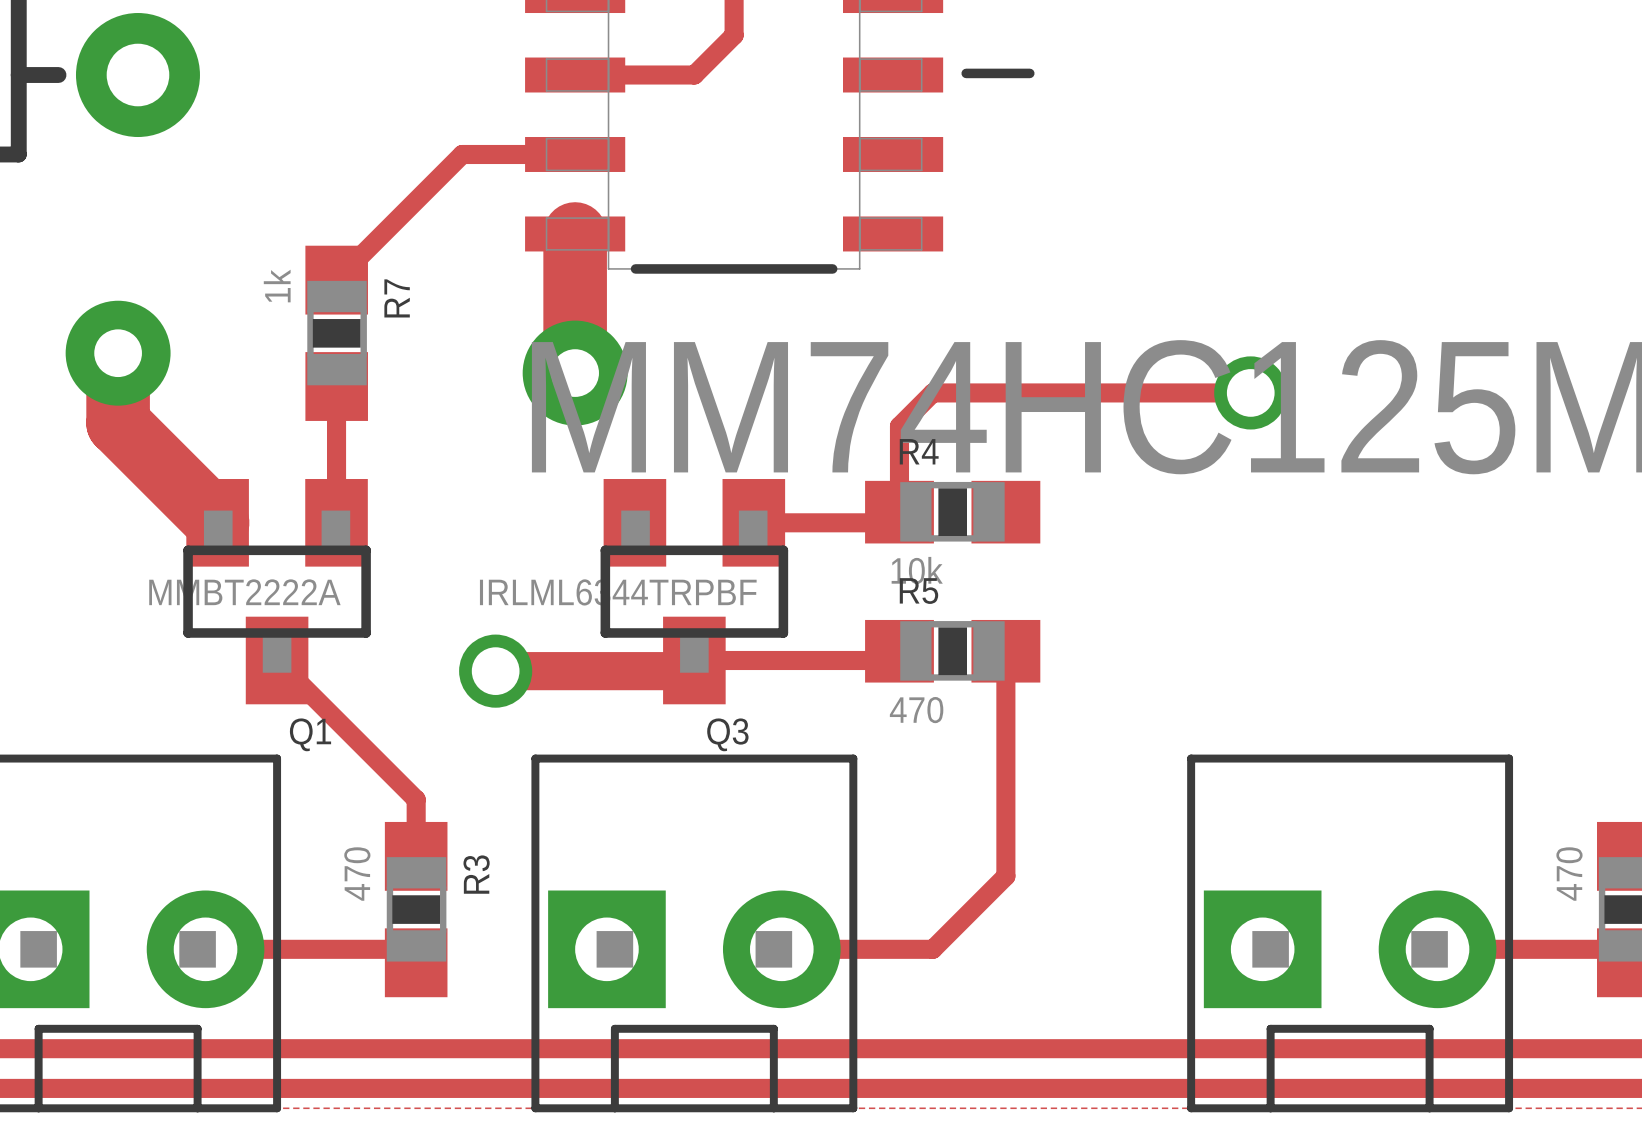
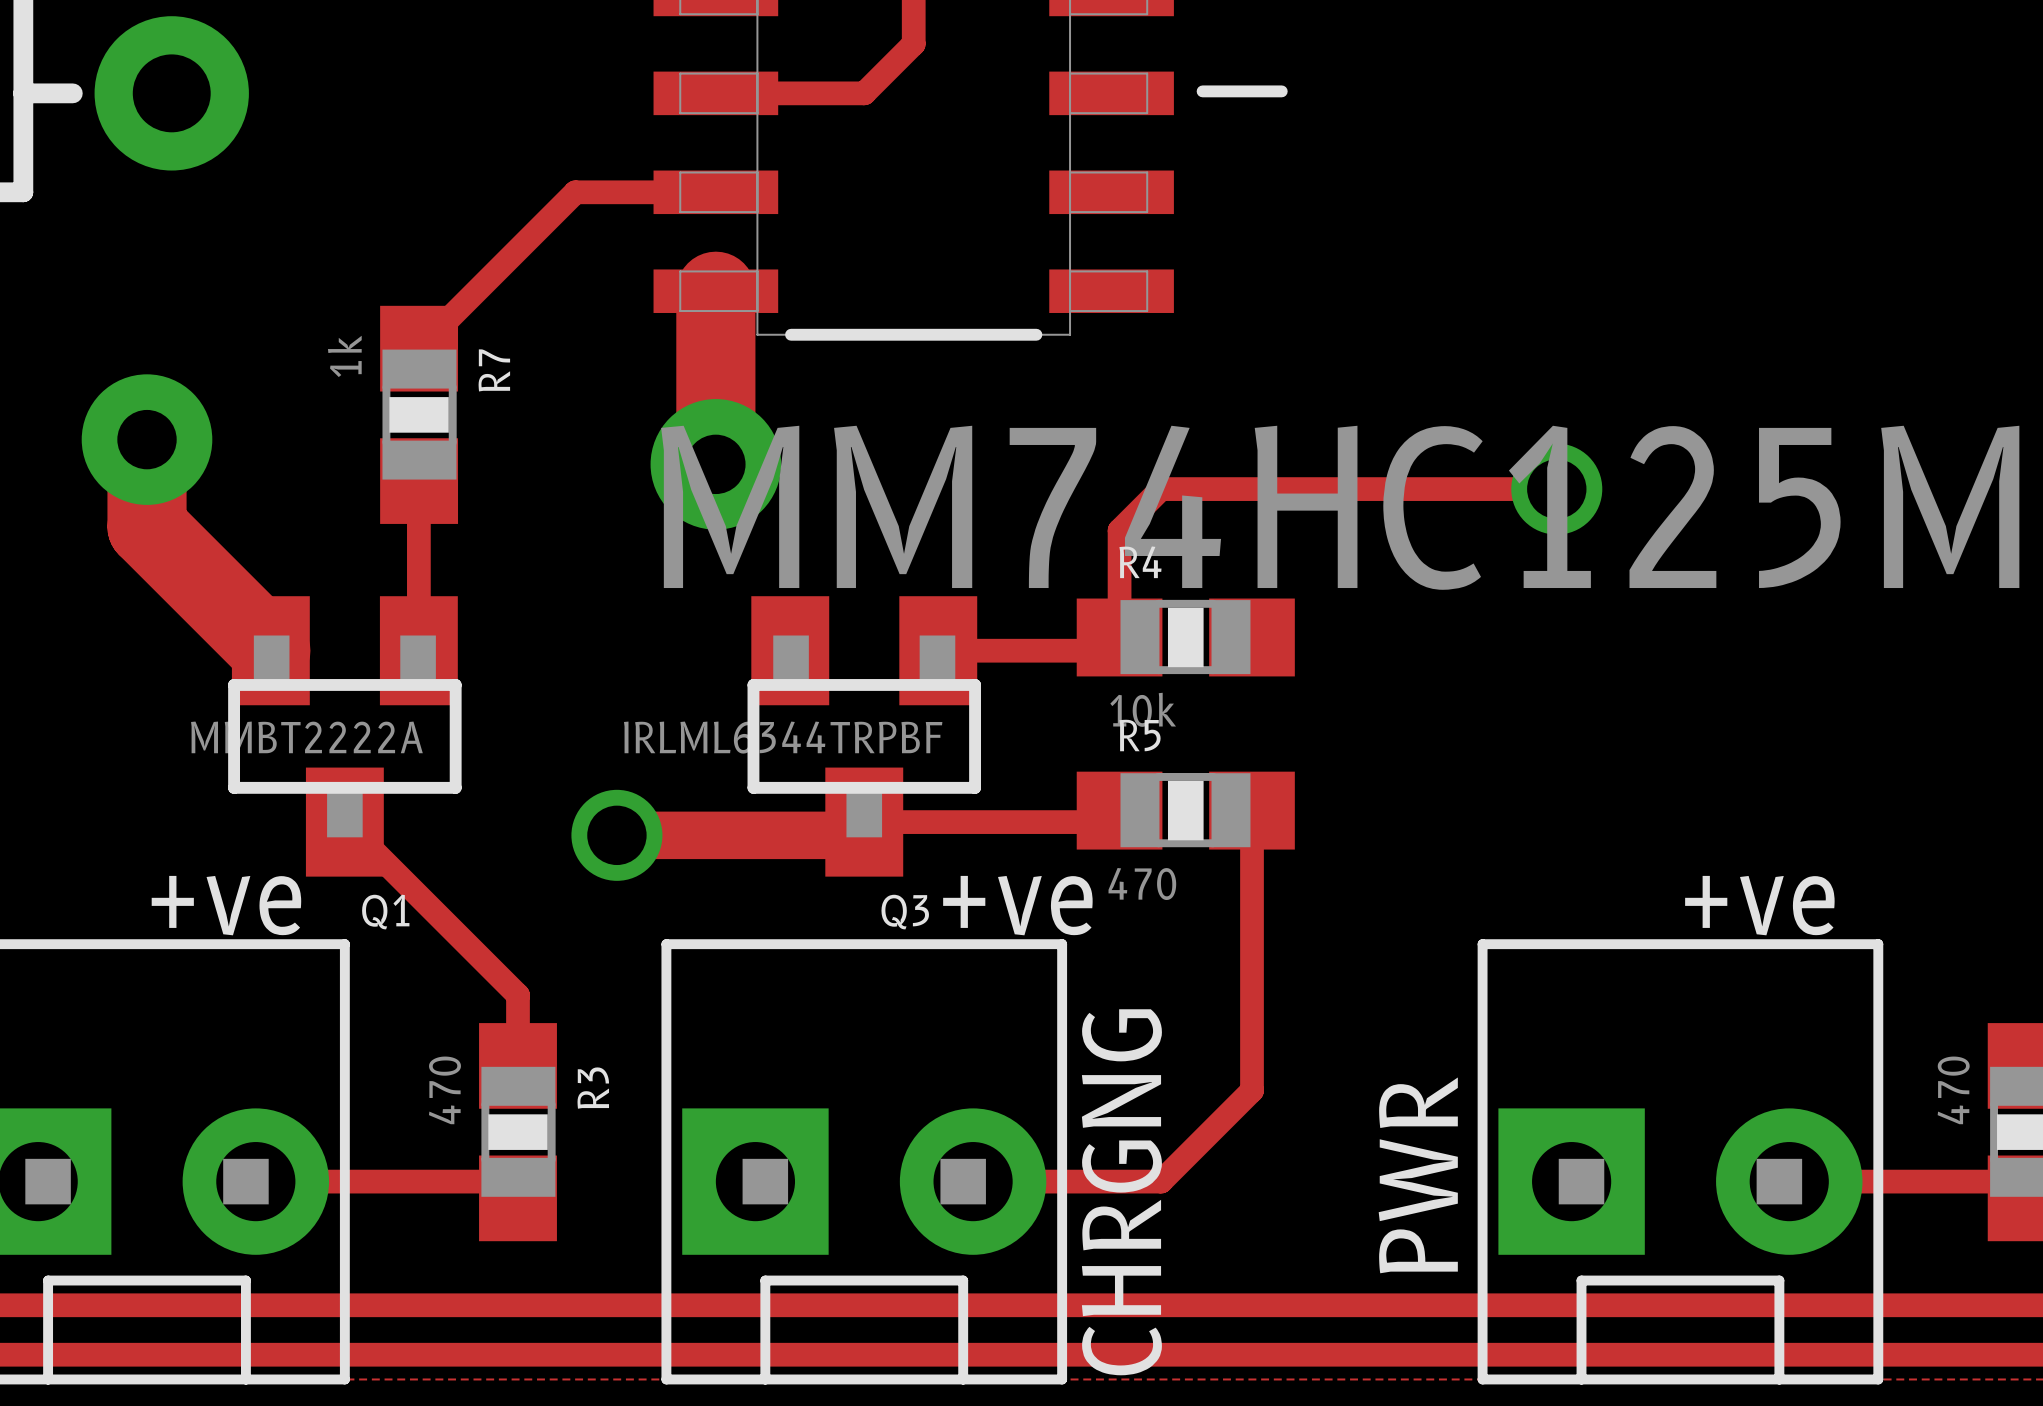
text: none -> +ve (226, 905)
text: none -> +ve (1017, 905)
text: none -> +ve (1759, 905)
text: none -> CHRGNG (1121, 1192)
text: none -> PWR (1418, 1175)

